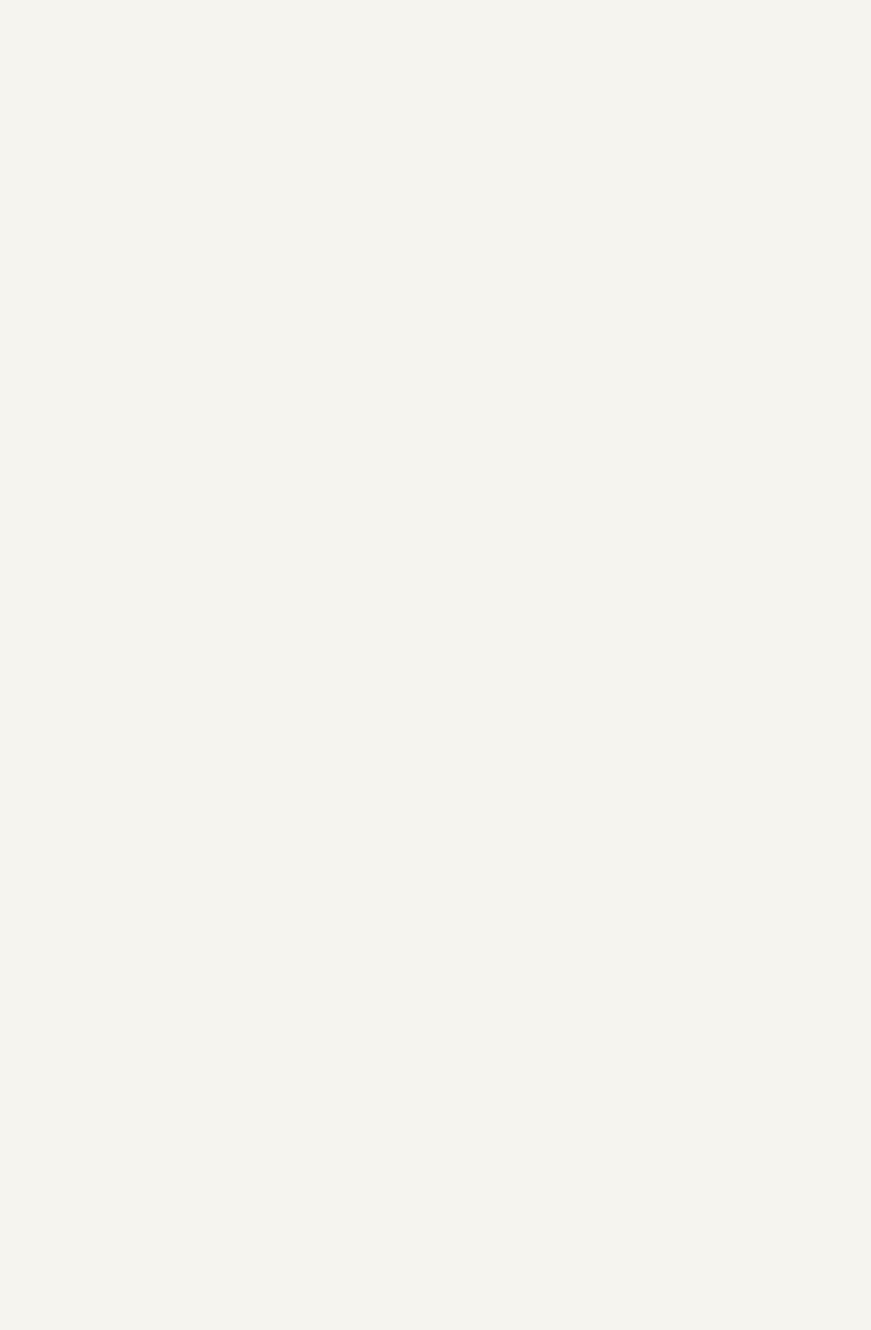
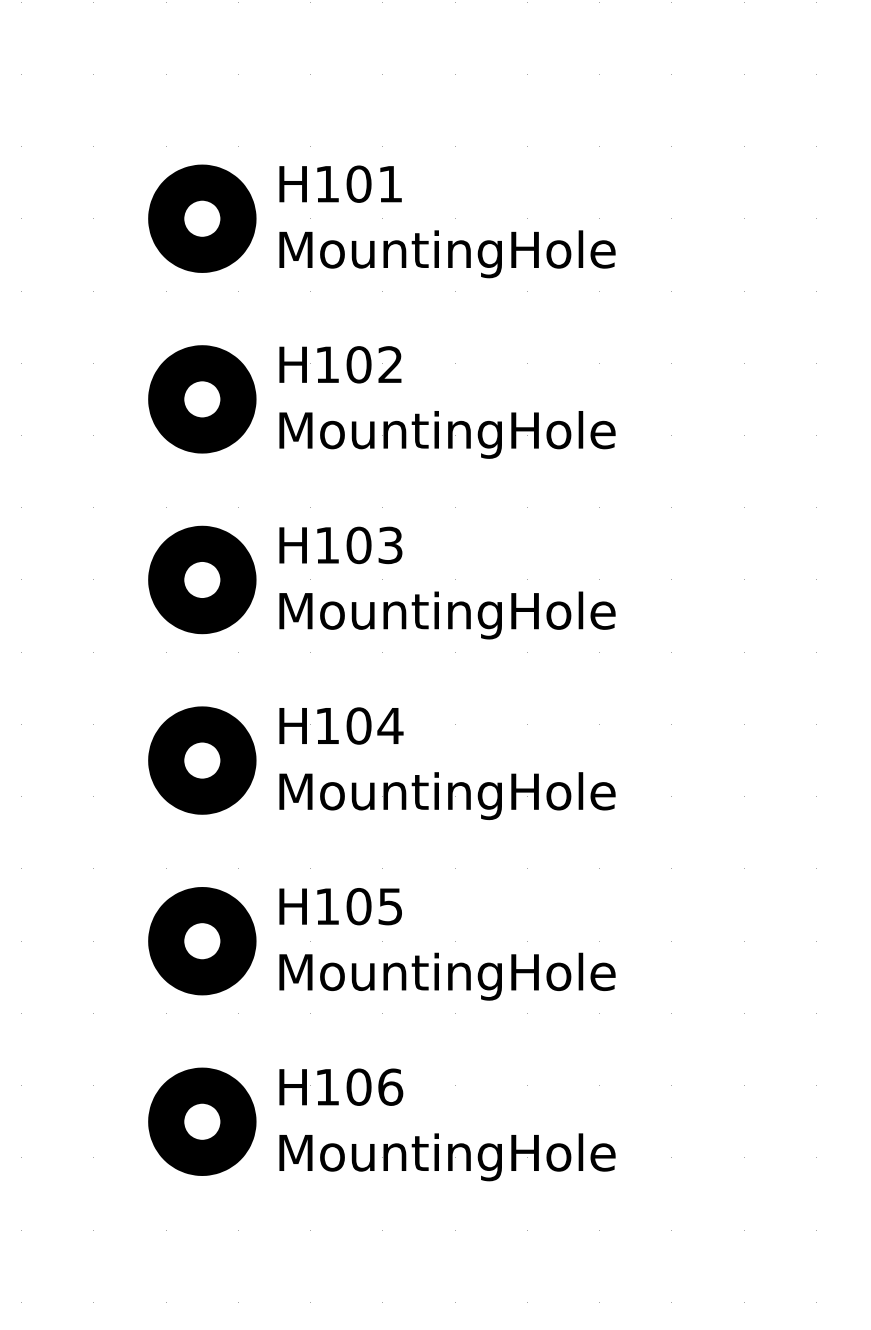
H101: none -> MountingHole (202, 218)
H102: none -> MountingHole (202, 399)
H103: none -> MountingHole (202, 579)
H104: none -> MountingHole (202, 760)
H105: none -> MountingHole (202, 941)
H106: none -> MountingHole (202, 1121)

